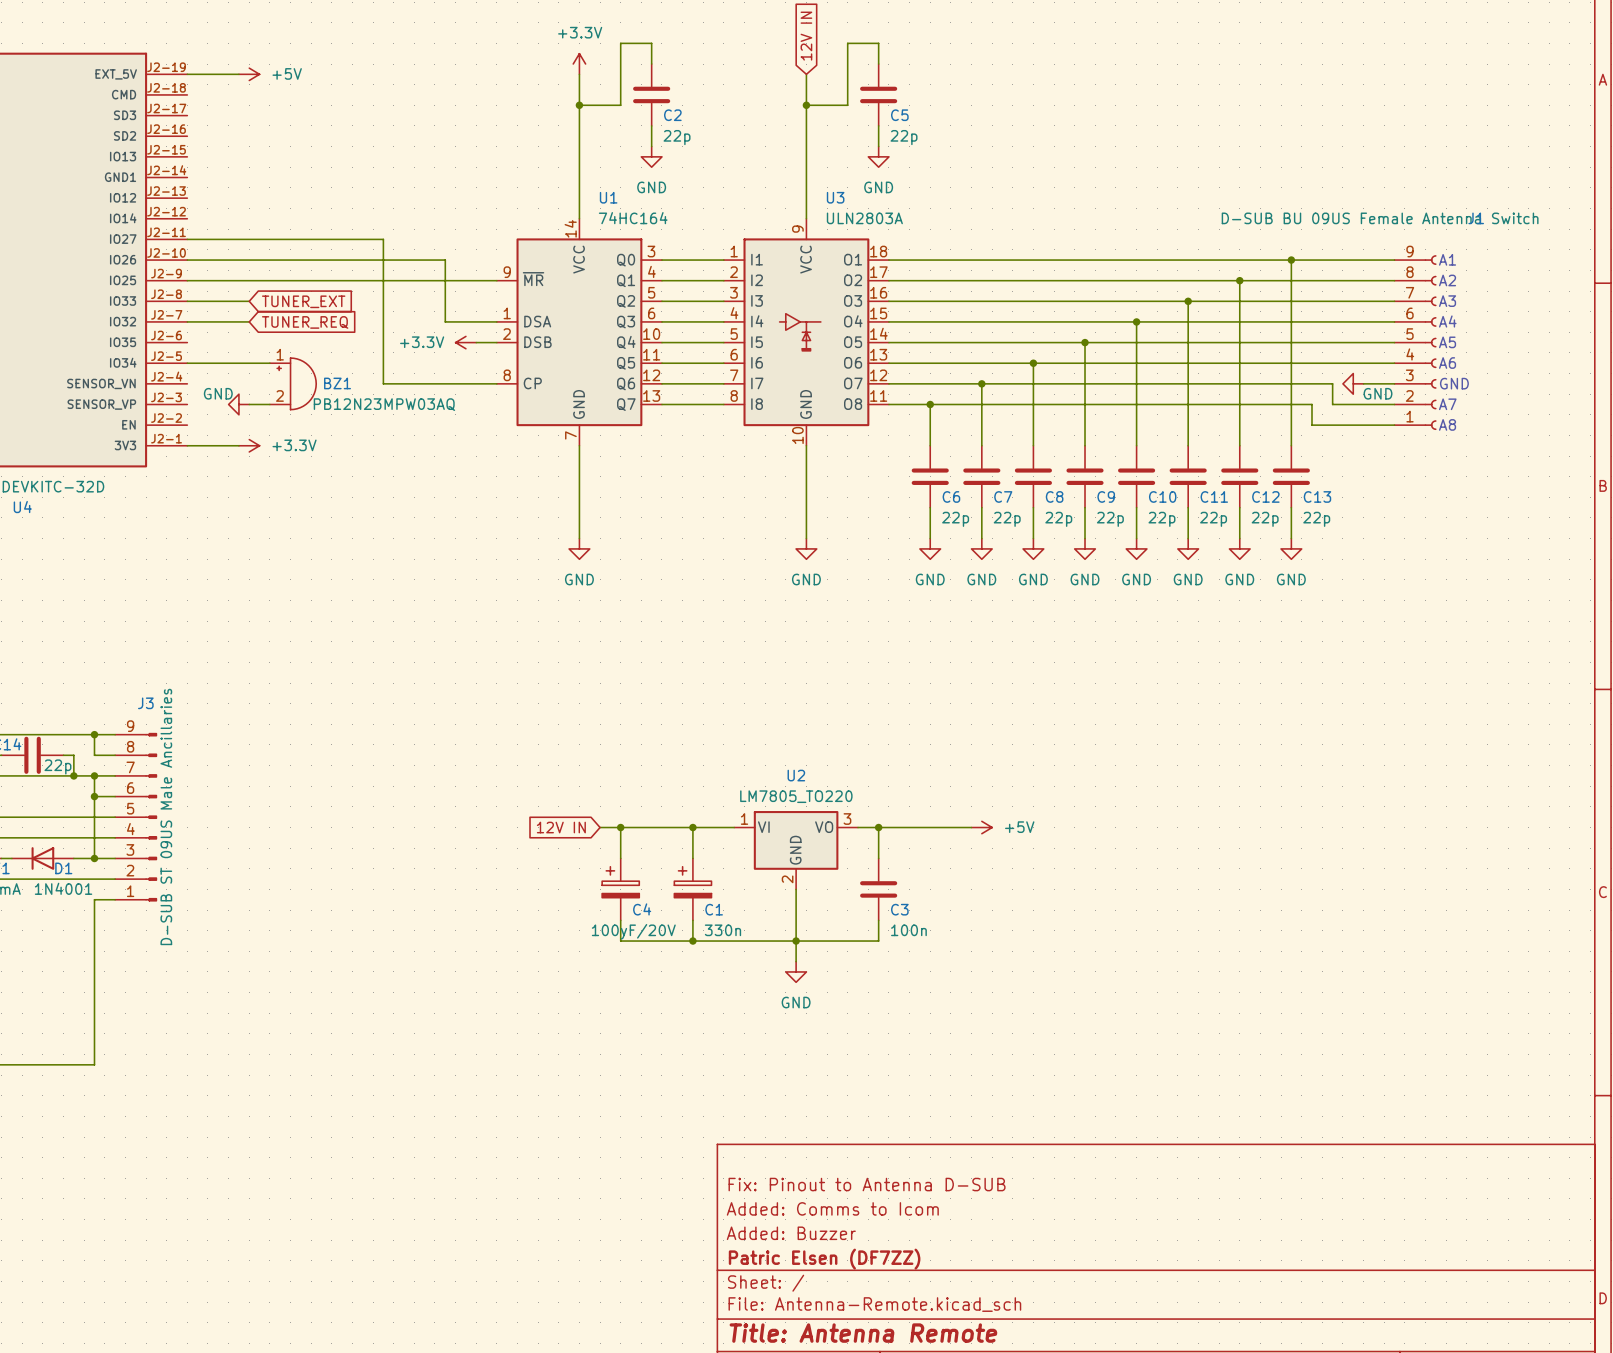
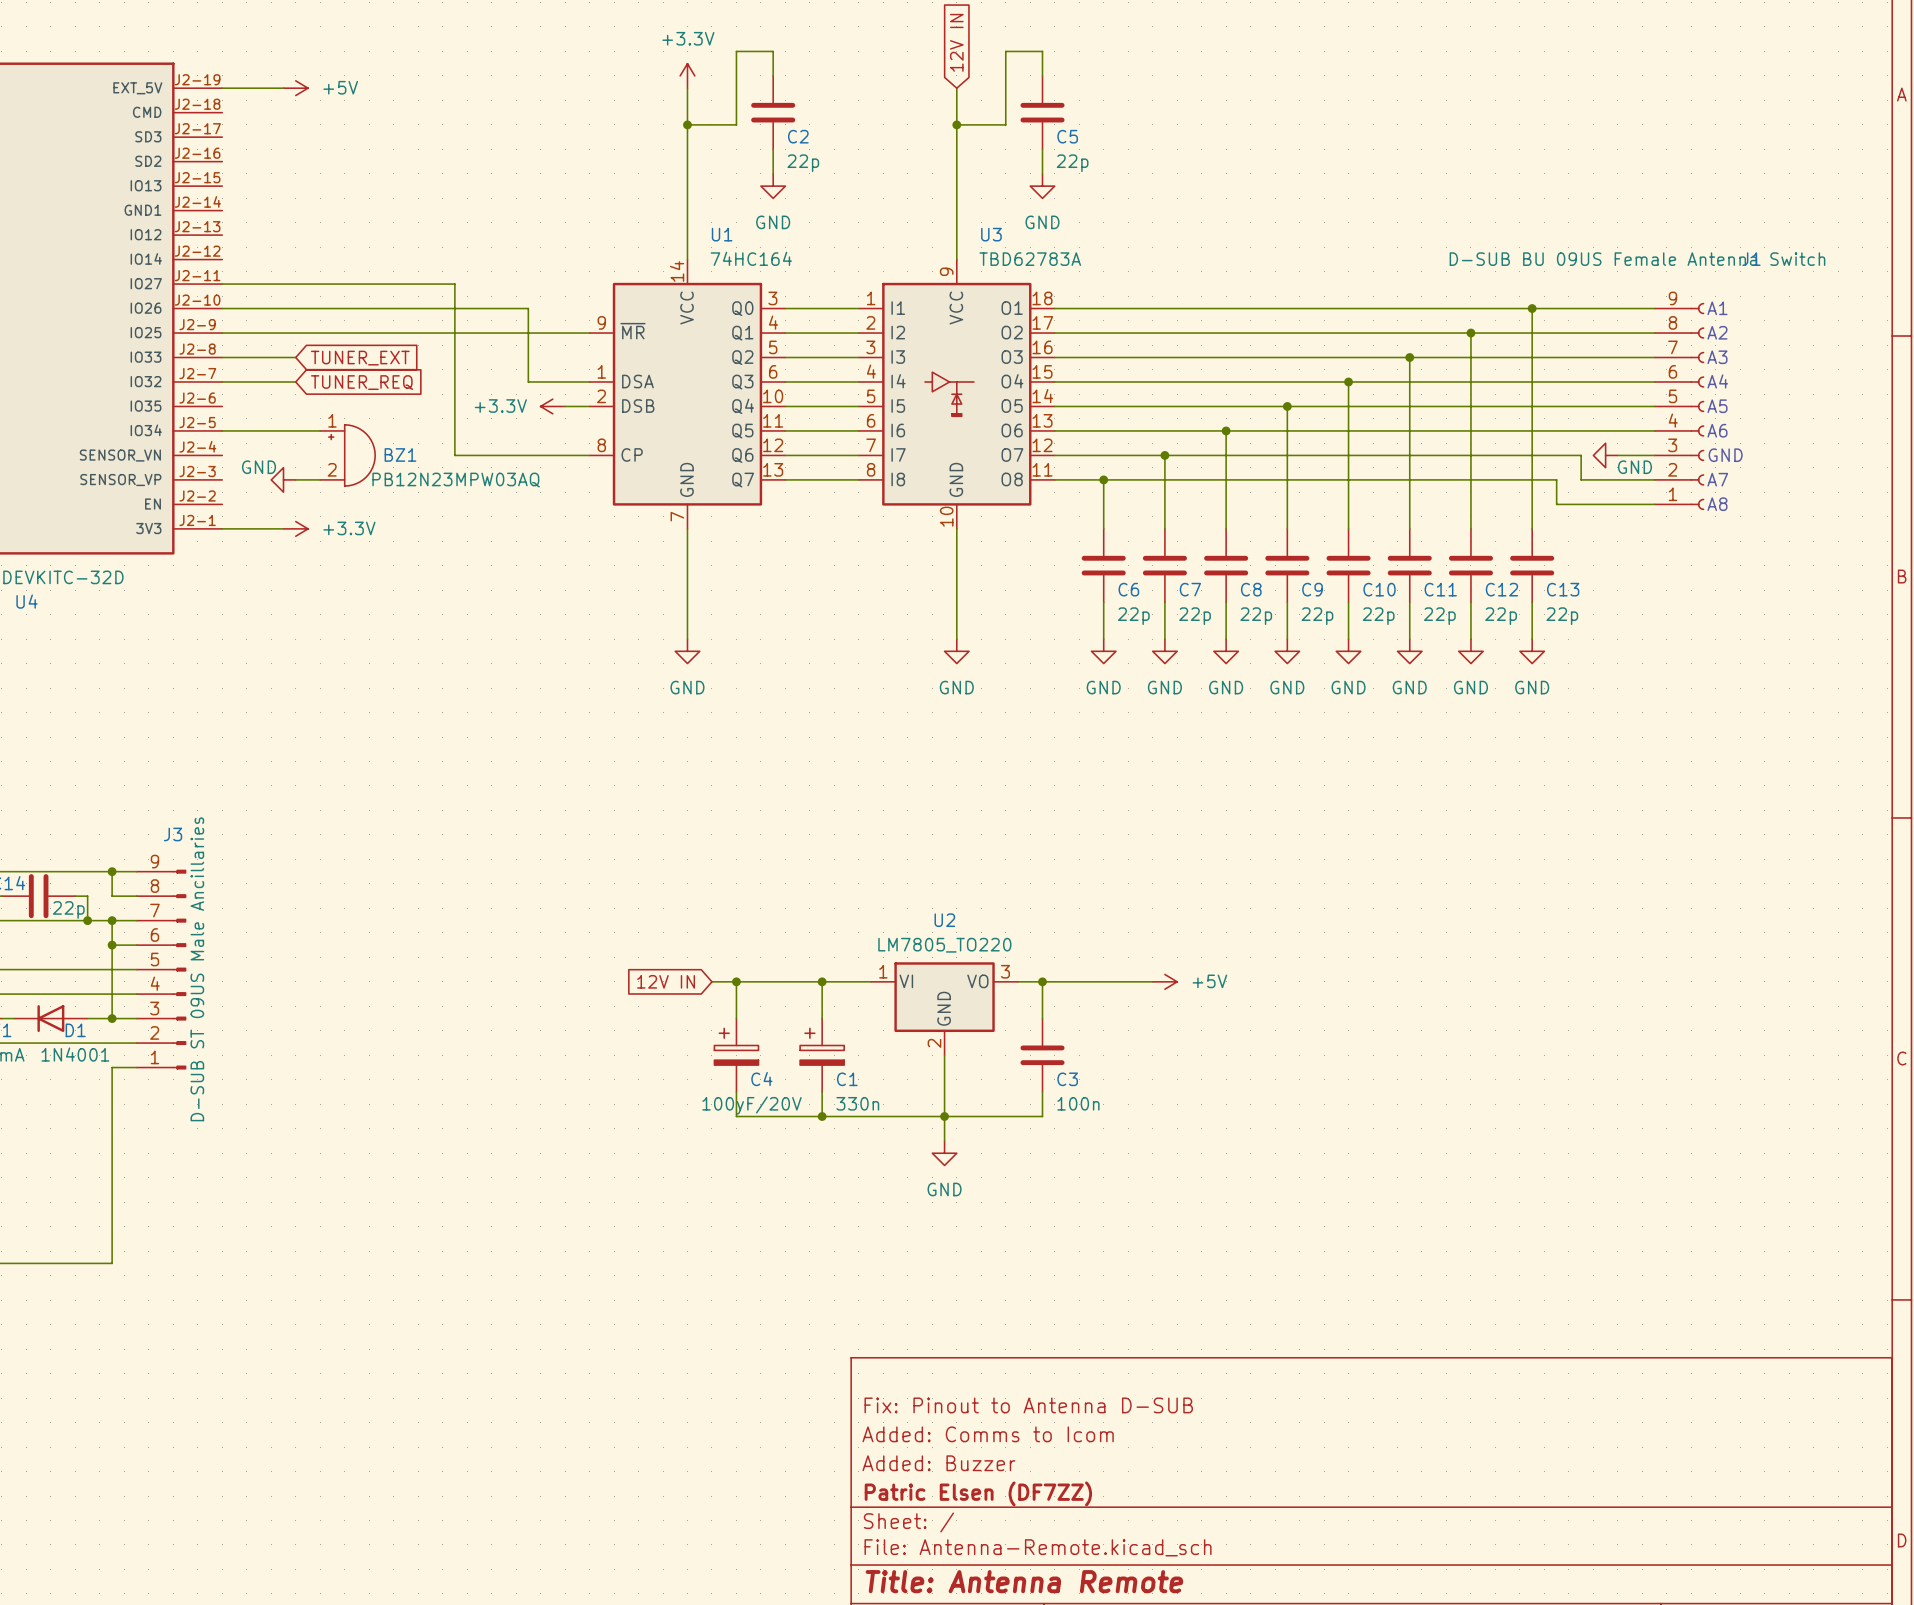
U3 value: ULN2803A (864, 218) -> TBD62783A (1030, 259)

